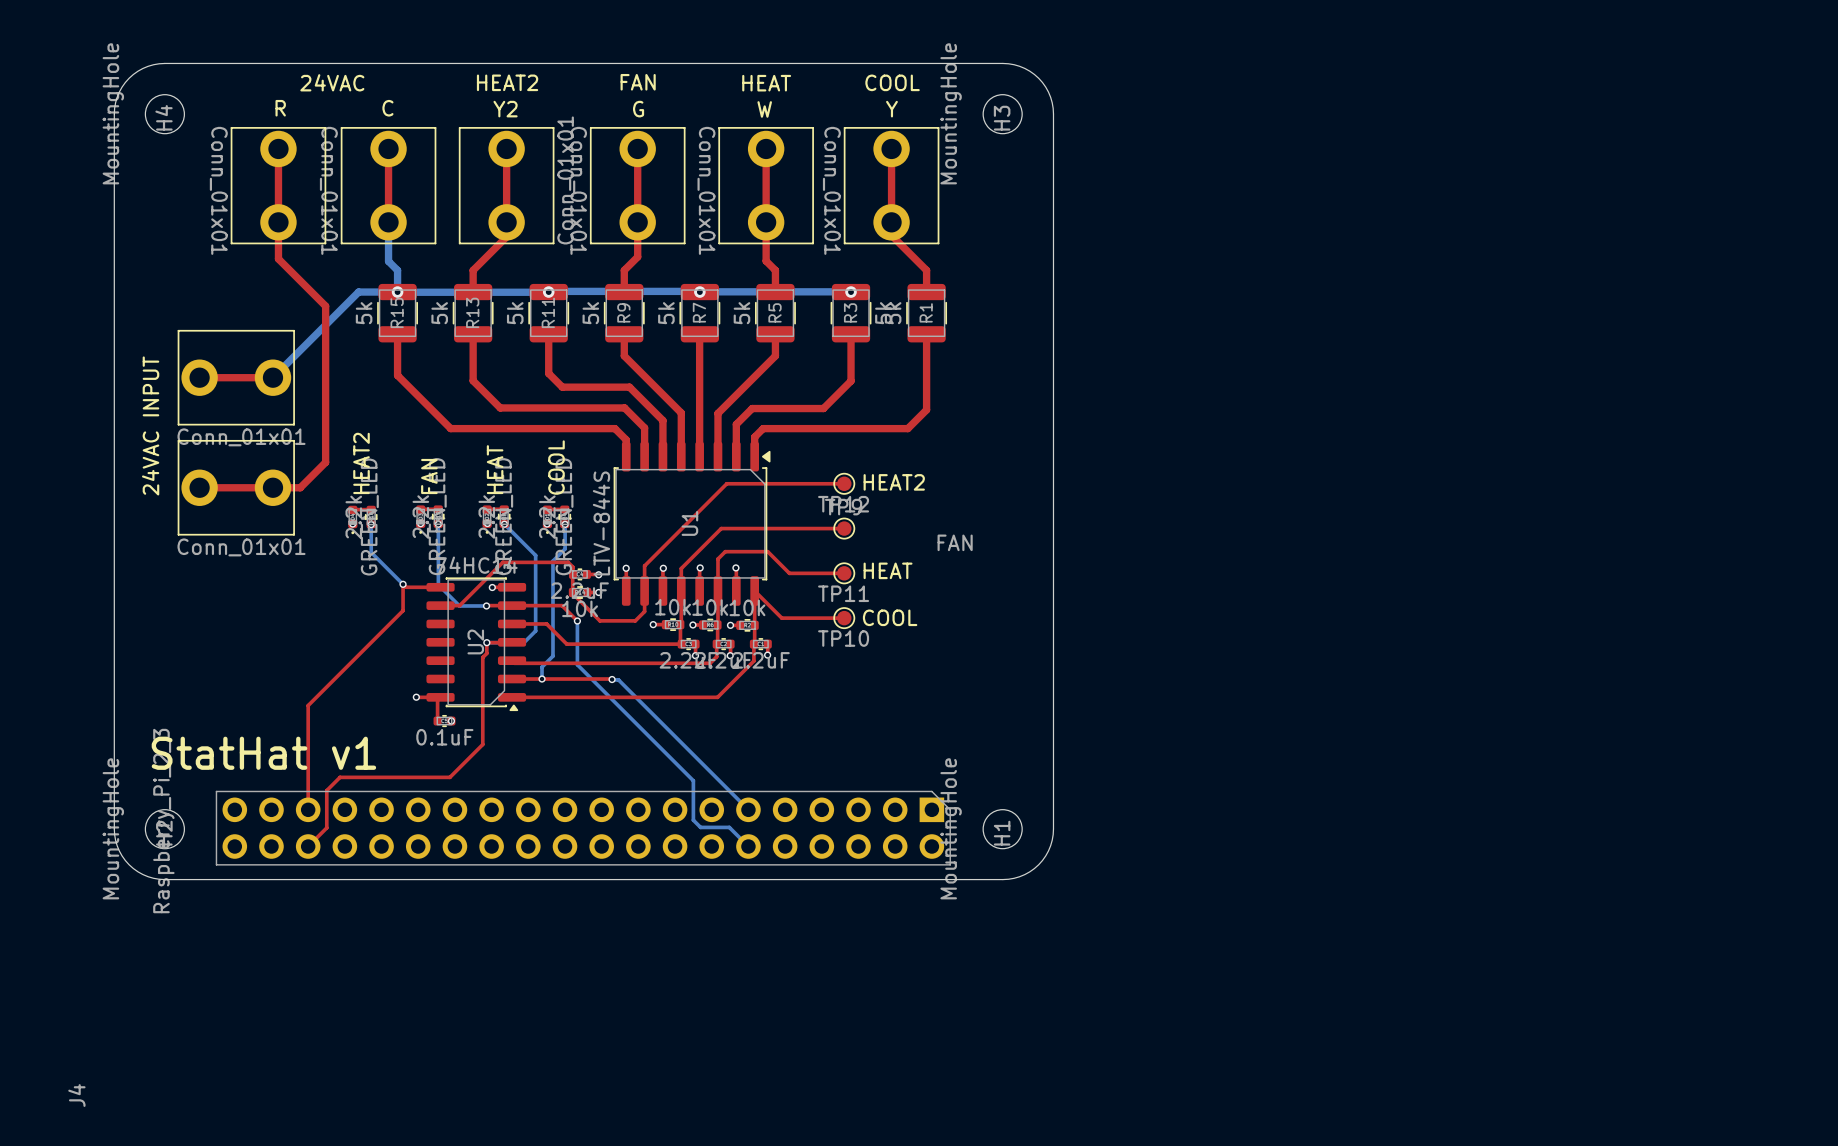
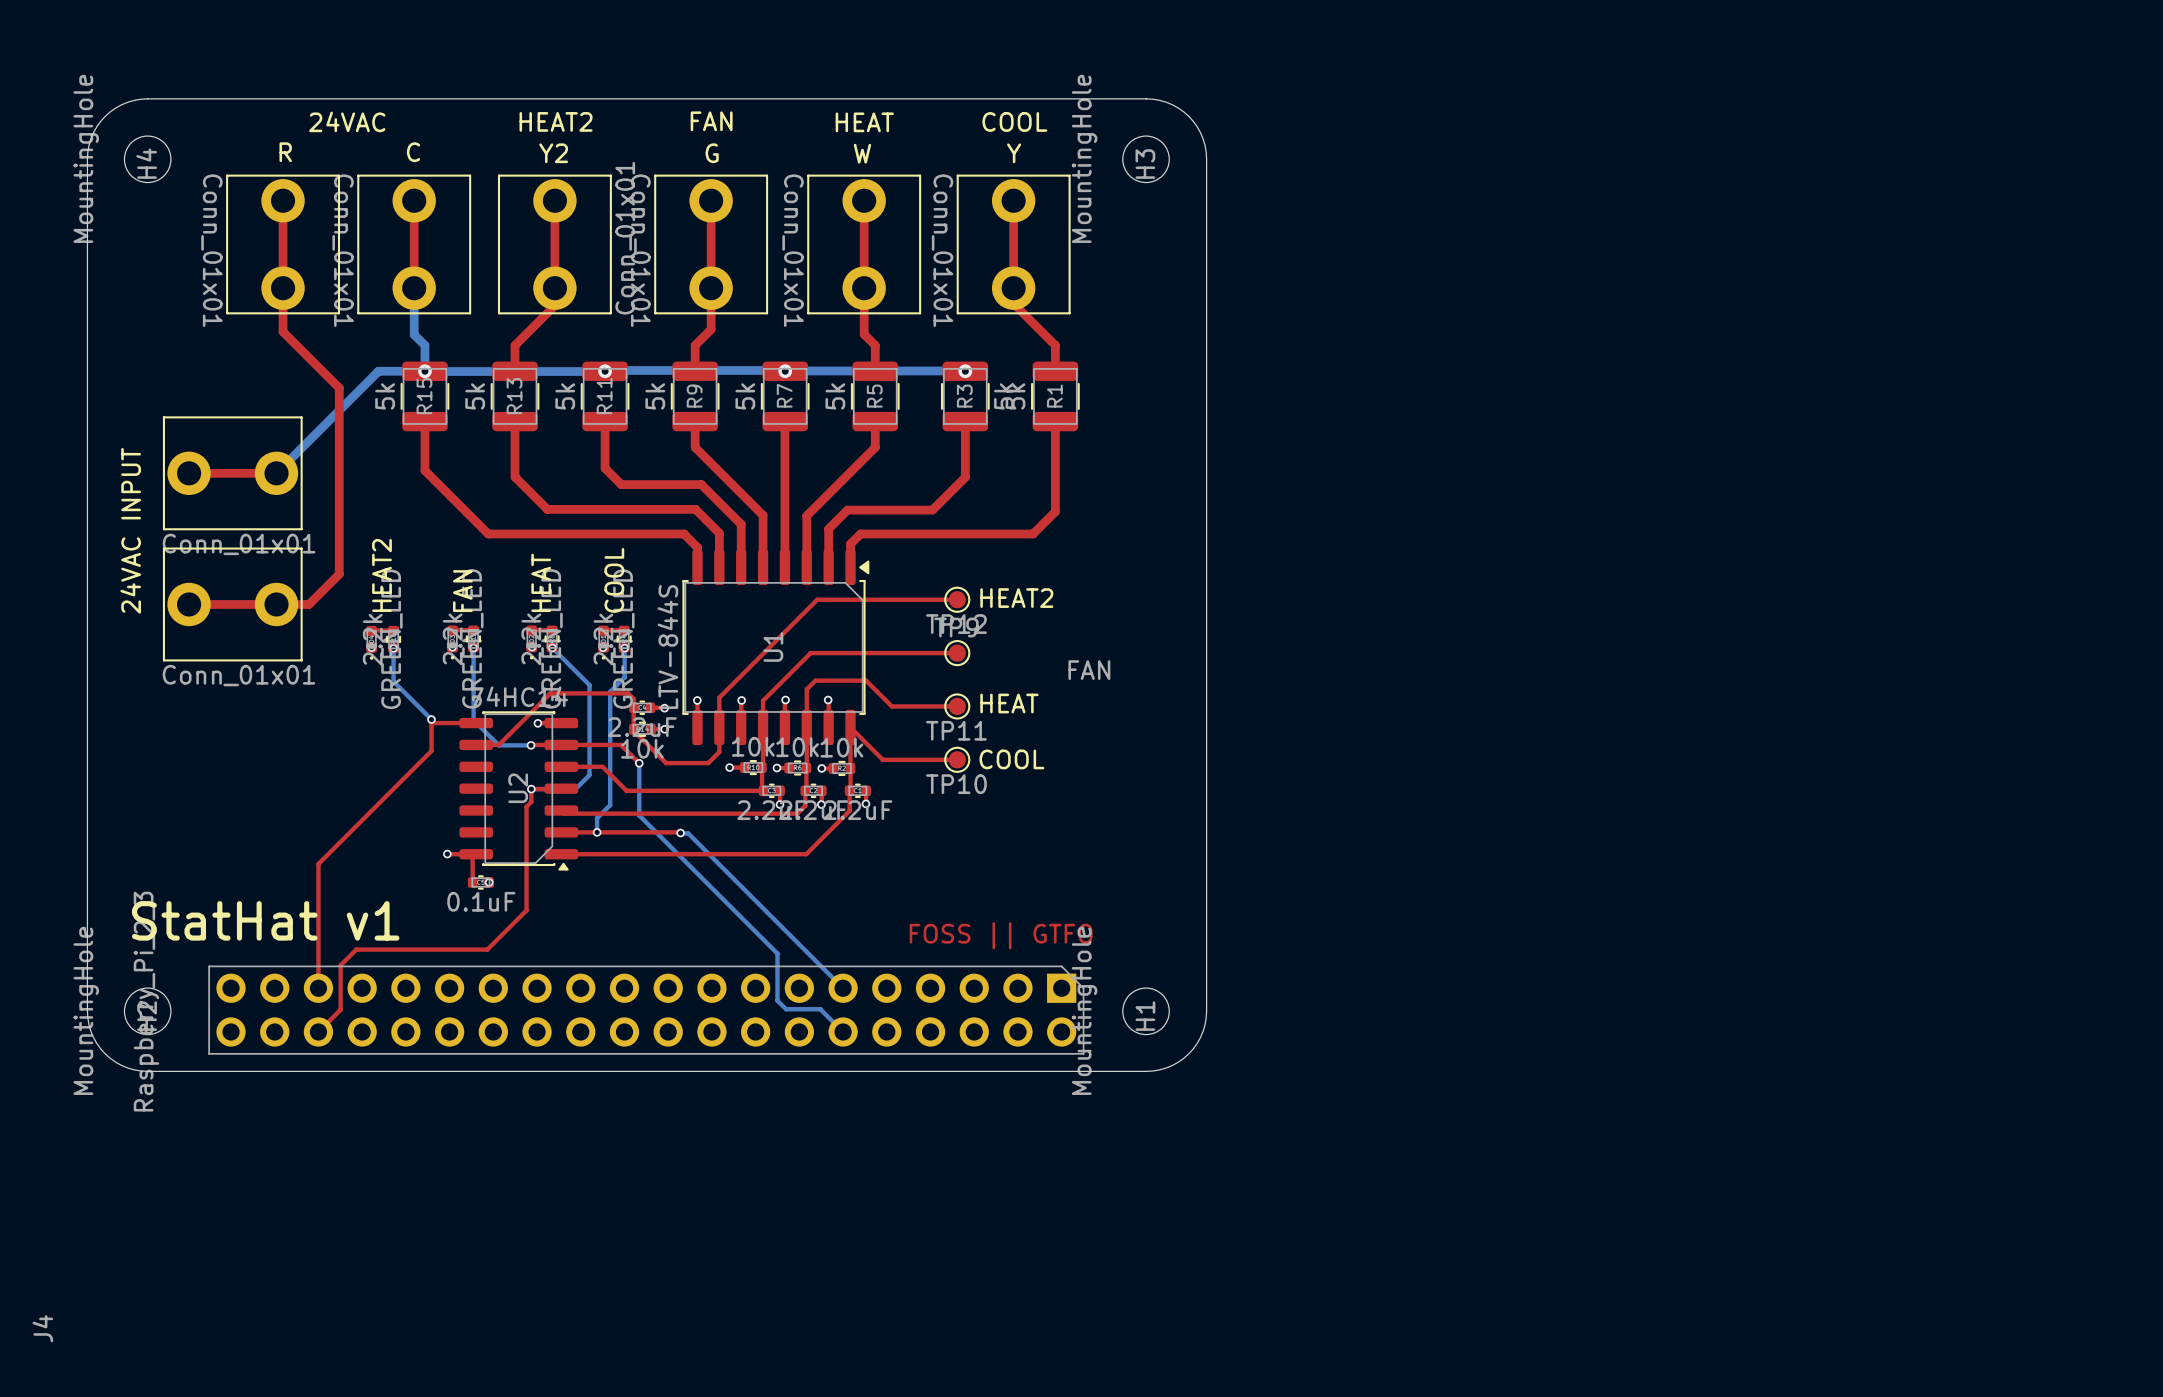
text: none -> FOSS || GTFO (1001, 935)

